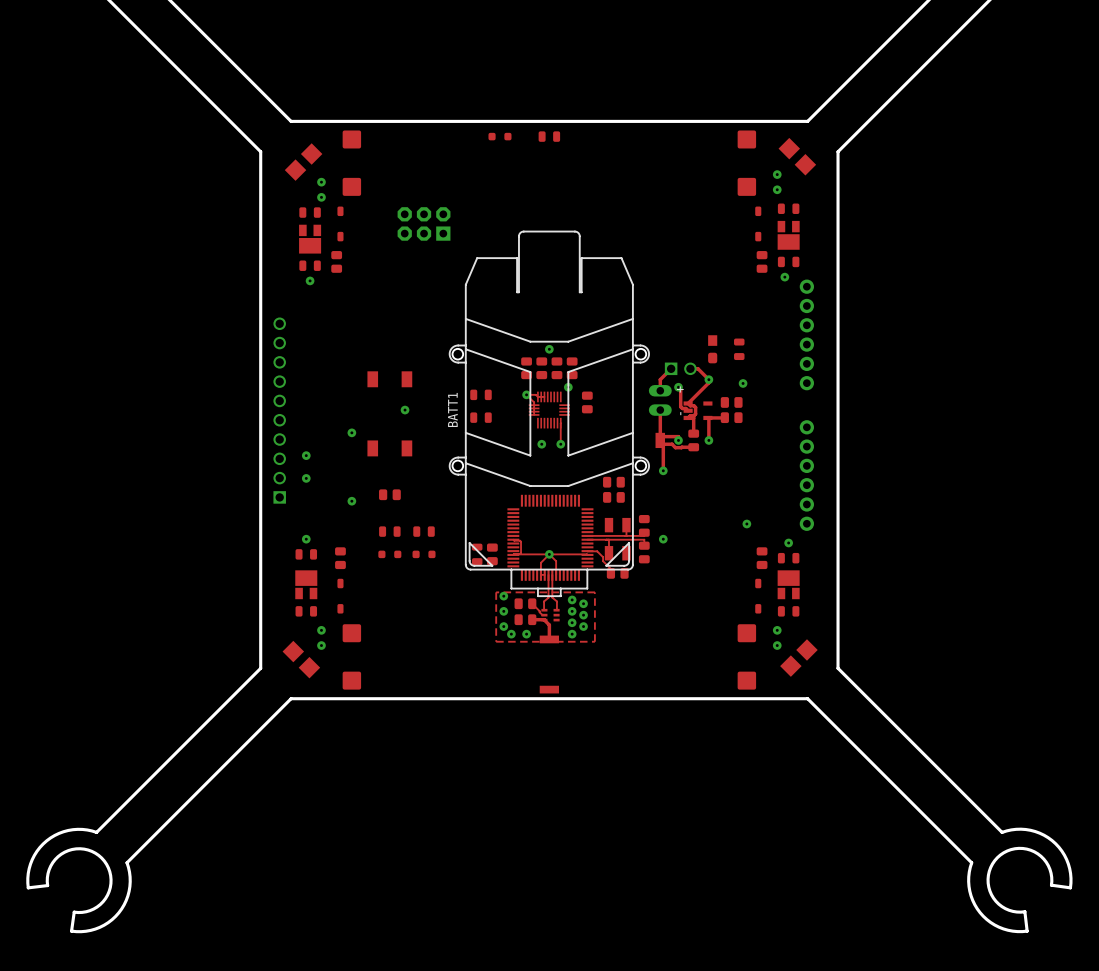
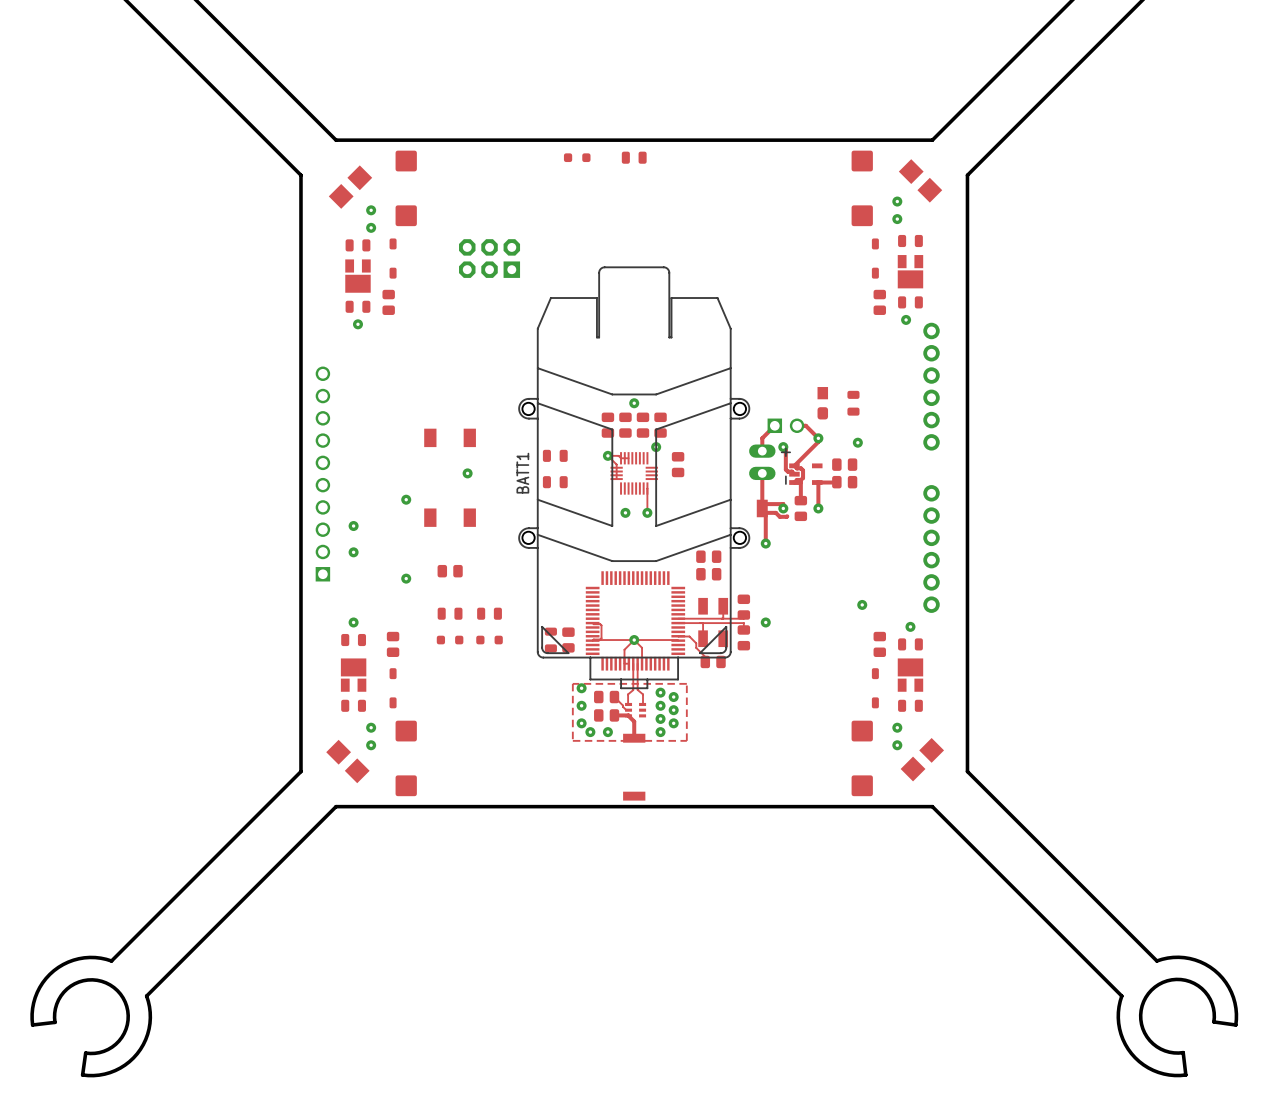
top track: (693, 447) (681, 447) -> none

